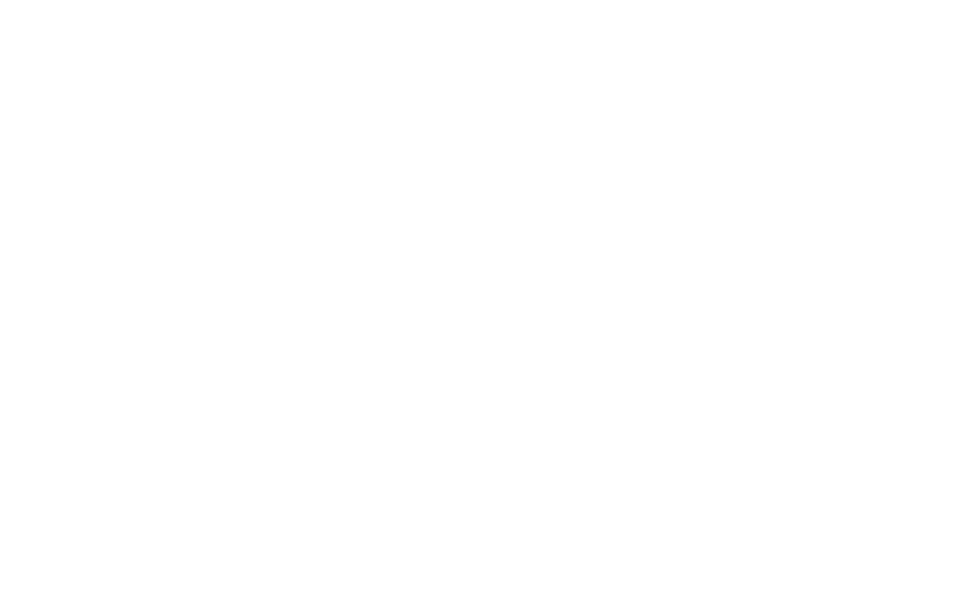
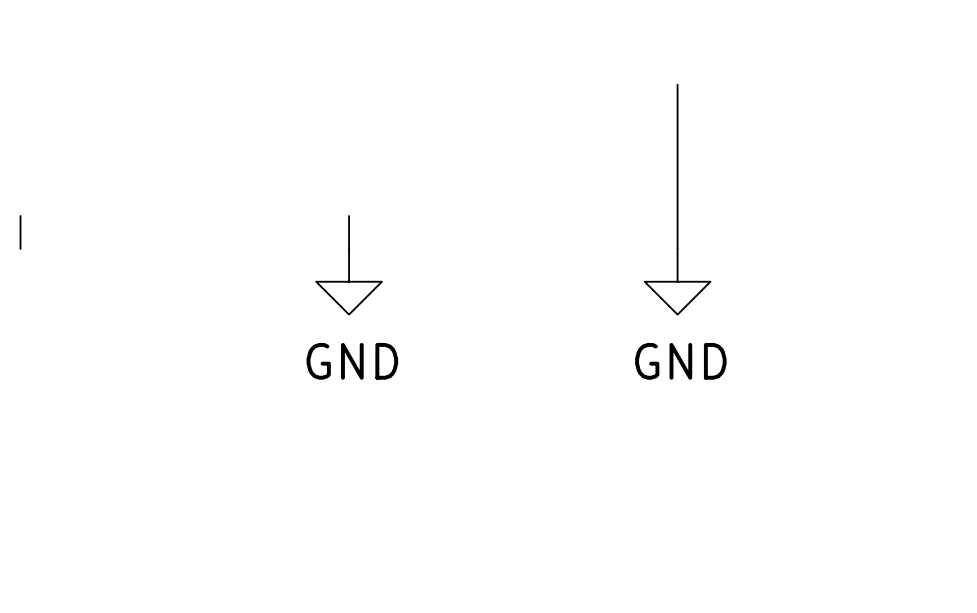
wire: none -> (677, 84) (677, 248)
wire: none -> (20, 216) (20, 248)
wire: none -> (349, 216) (349, 248)
power symbol: none -> GND (349, 281)
power symbol: none -> GND (677, 281)

